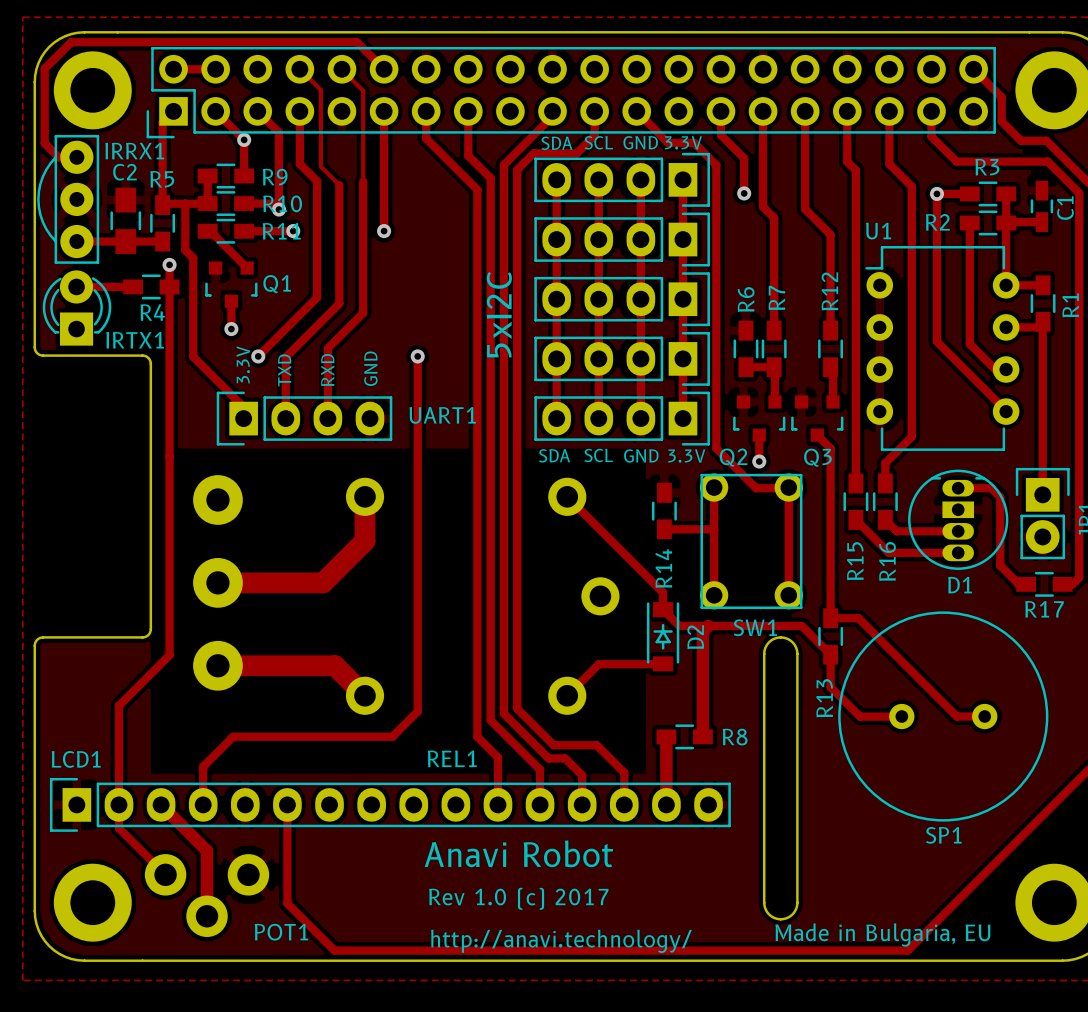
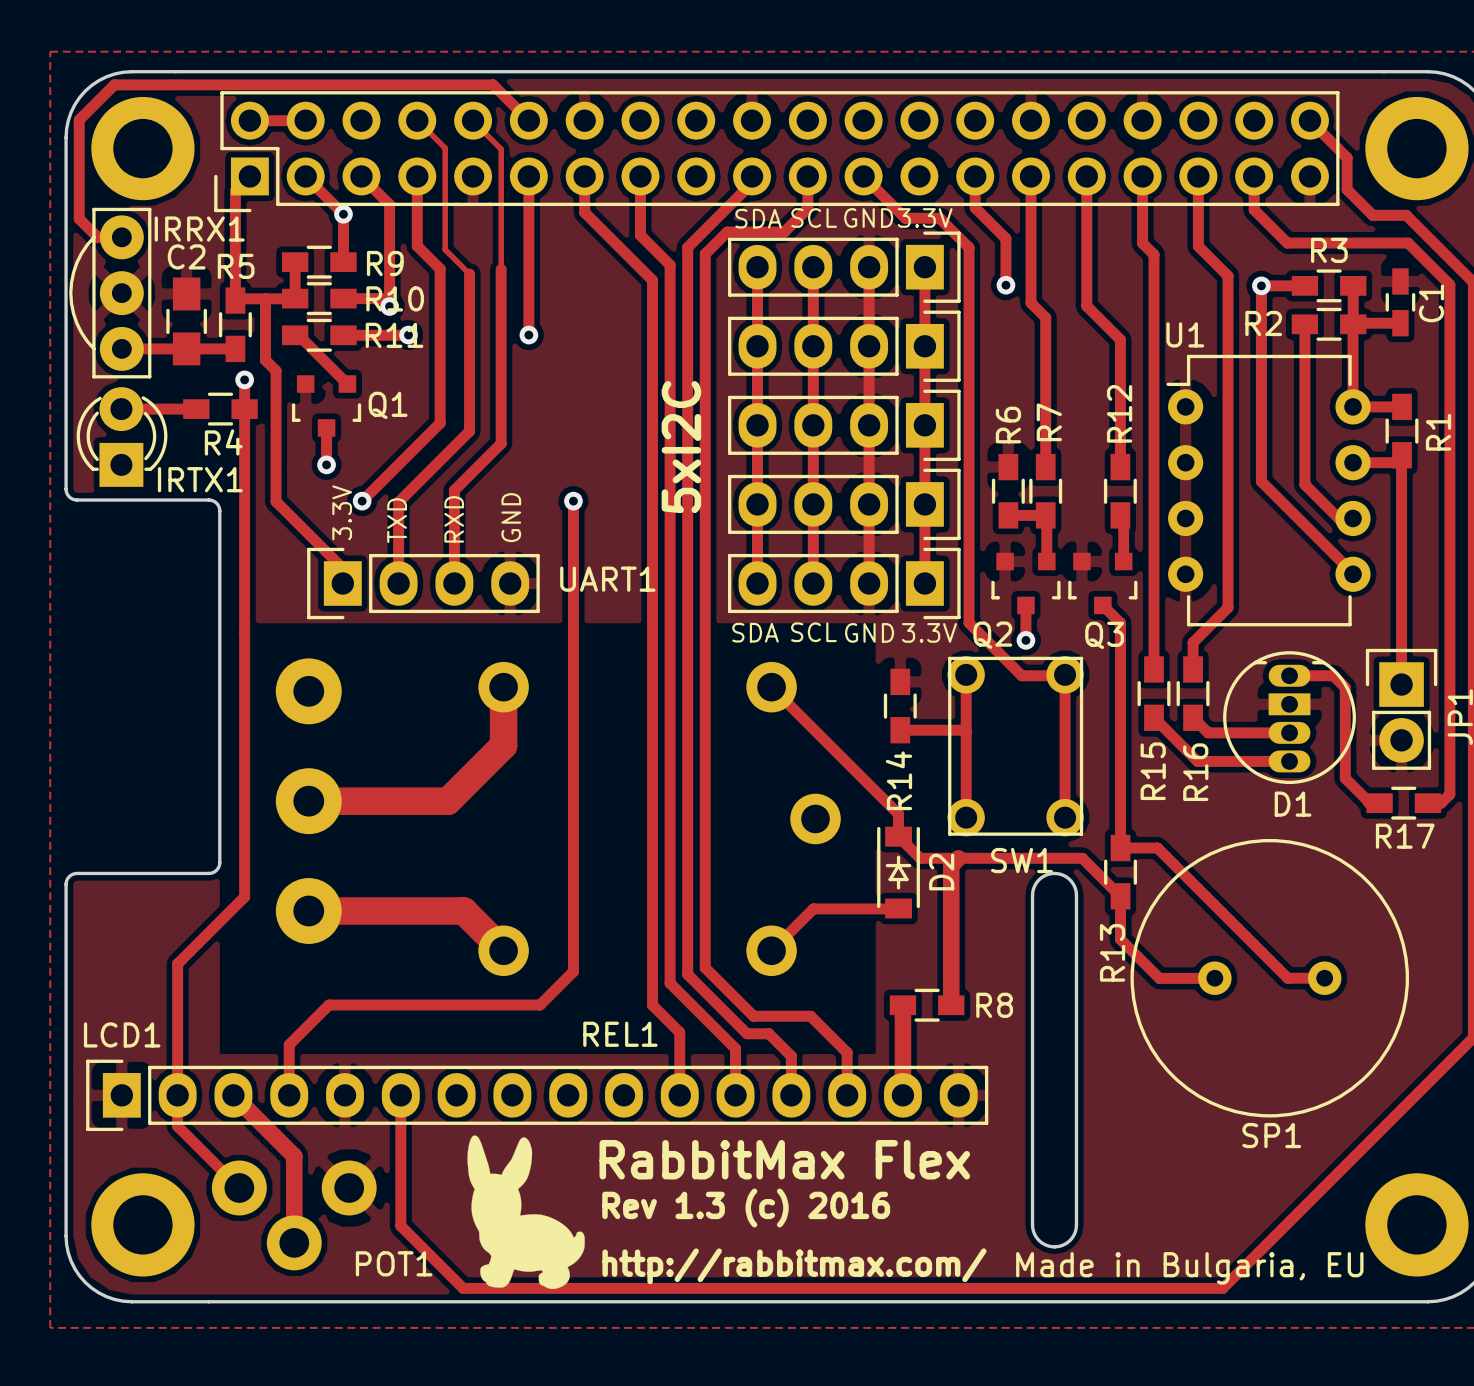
drawing: none -> [467, 1135, 585, 1290]
text: none -> RabbitMax Flex (784, 1159)
text: Anavi Robot (518, 853) -> none
text: Rev 1.0 (c) 2017 (518, 898) -> Rev 1.3 (c) 2016 (746, 1208)
text: none -> http://rabbitmax.com/ (794, 1266)
text: http://anavi.technology/ (561, 941) -> none

